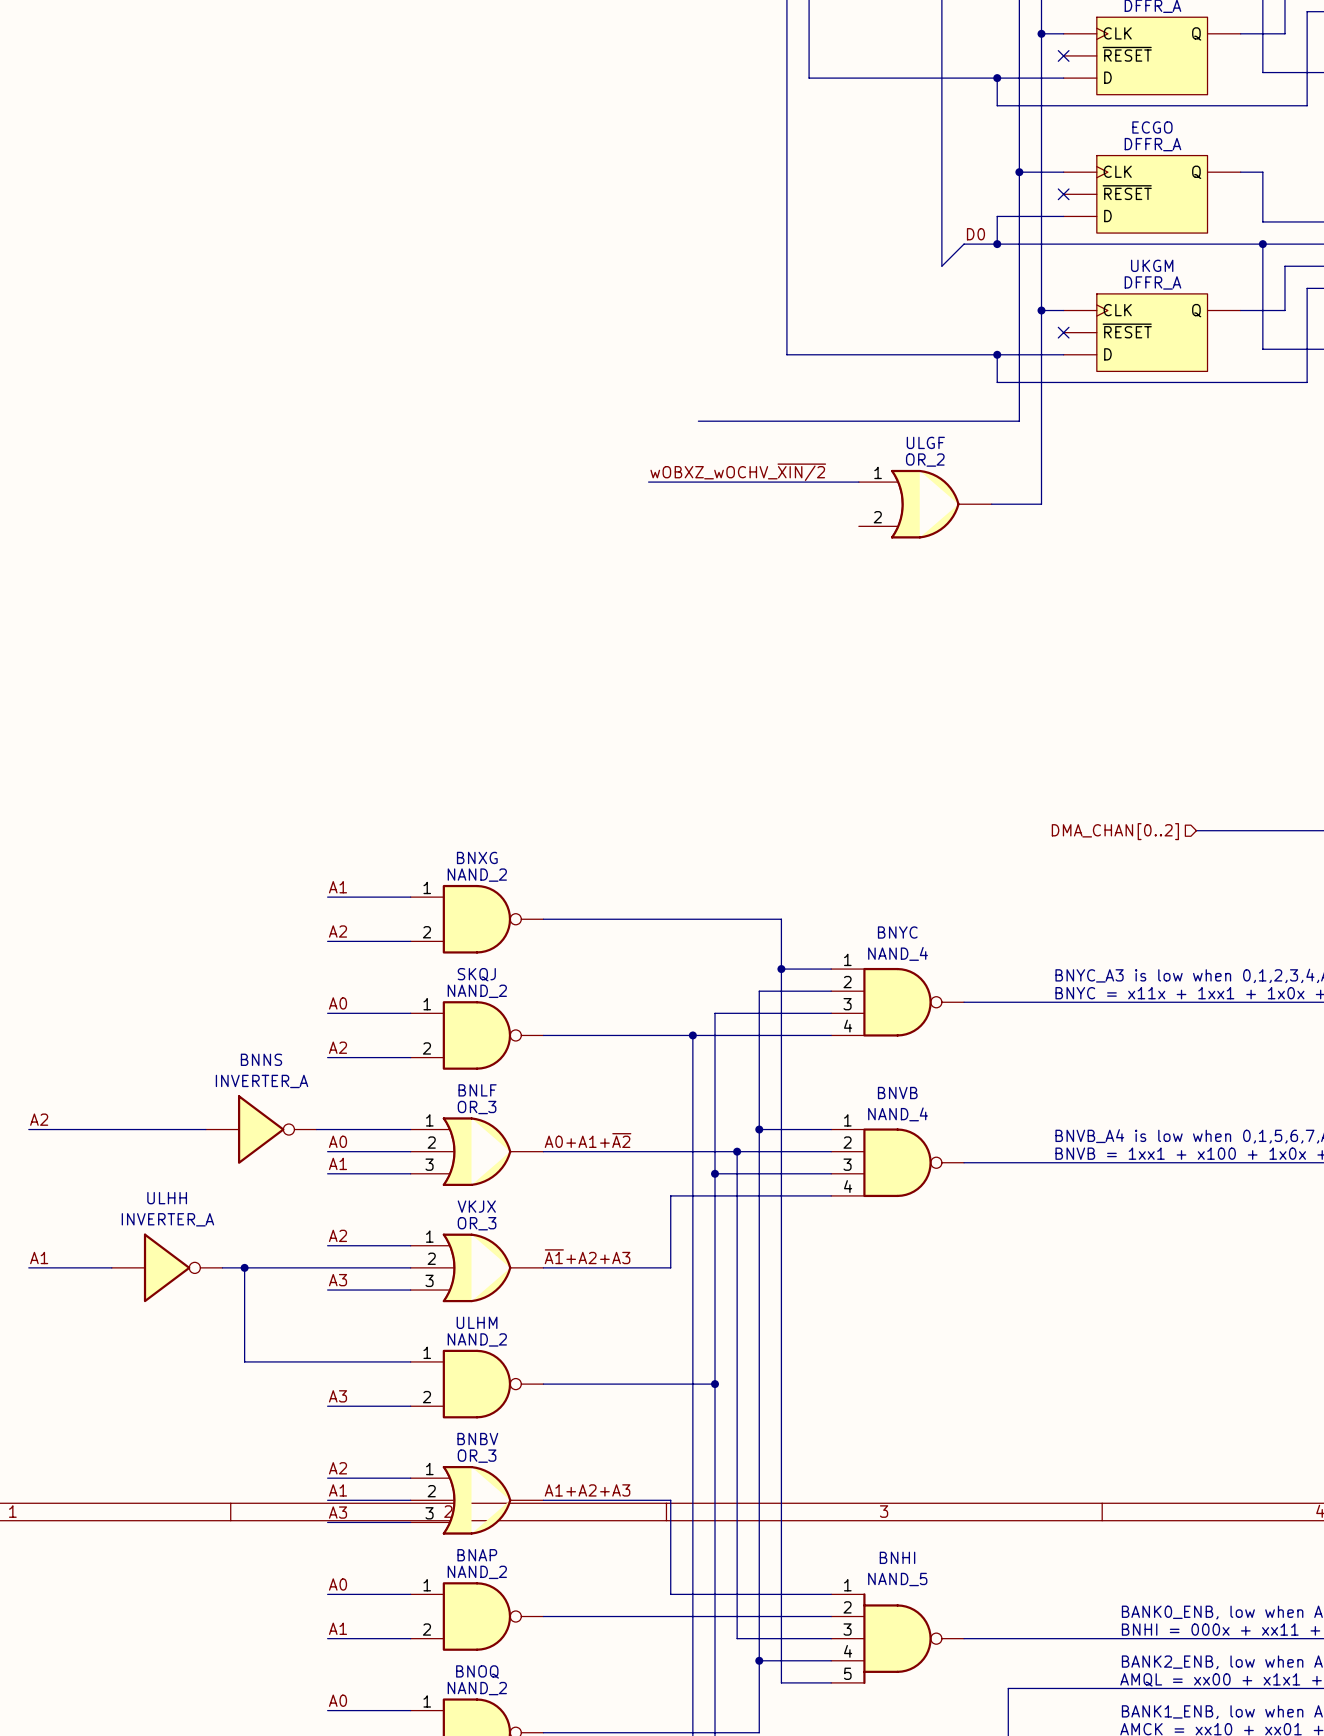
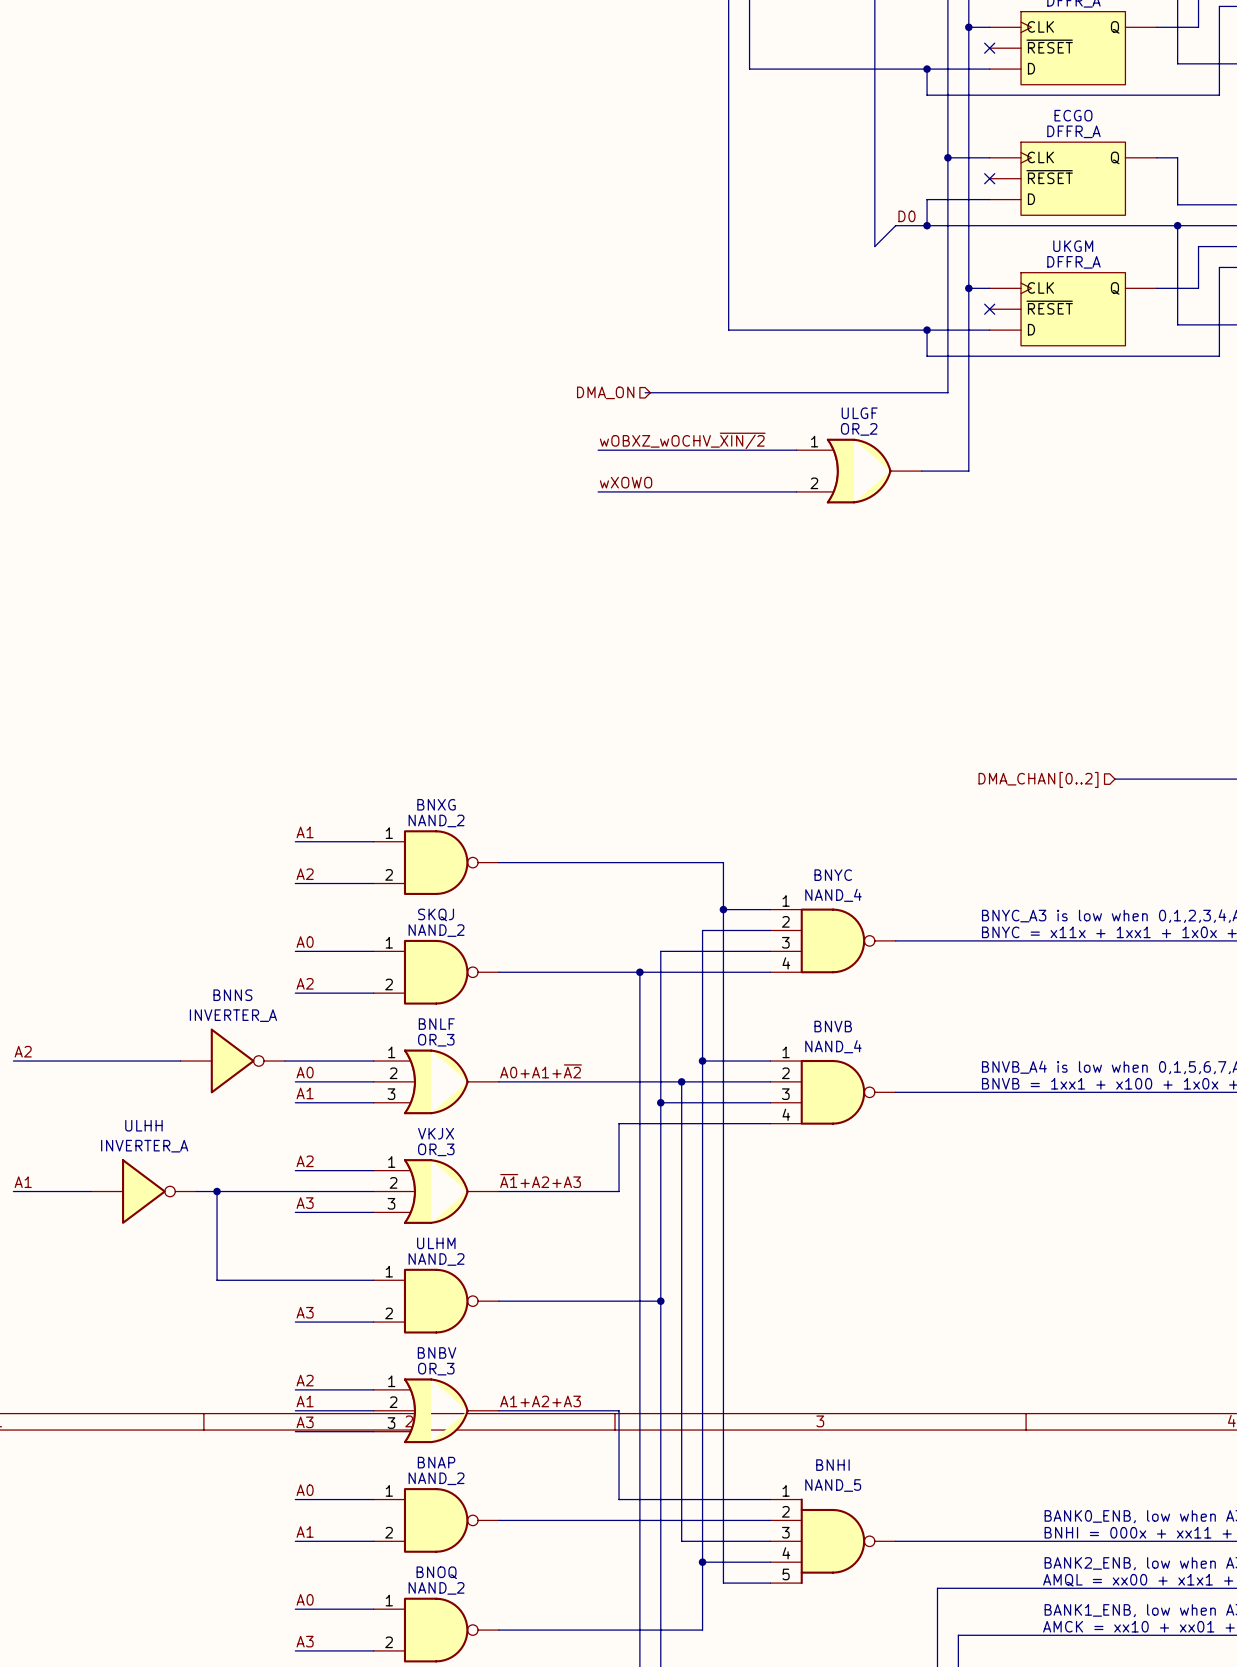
hierarchical label: none -> DMA_ON (605, 392)
label: none -> wXOWO (626, 482)
wire: none -> (598, 491) (796, 491)

